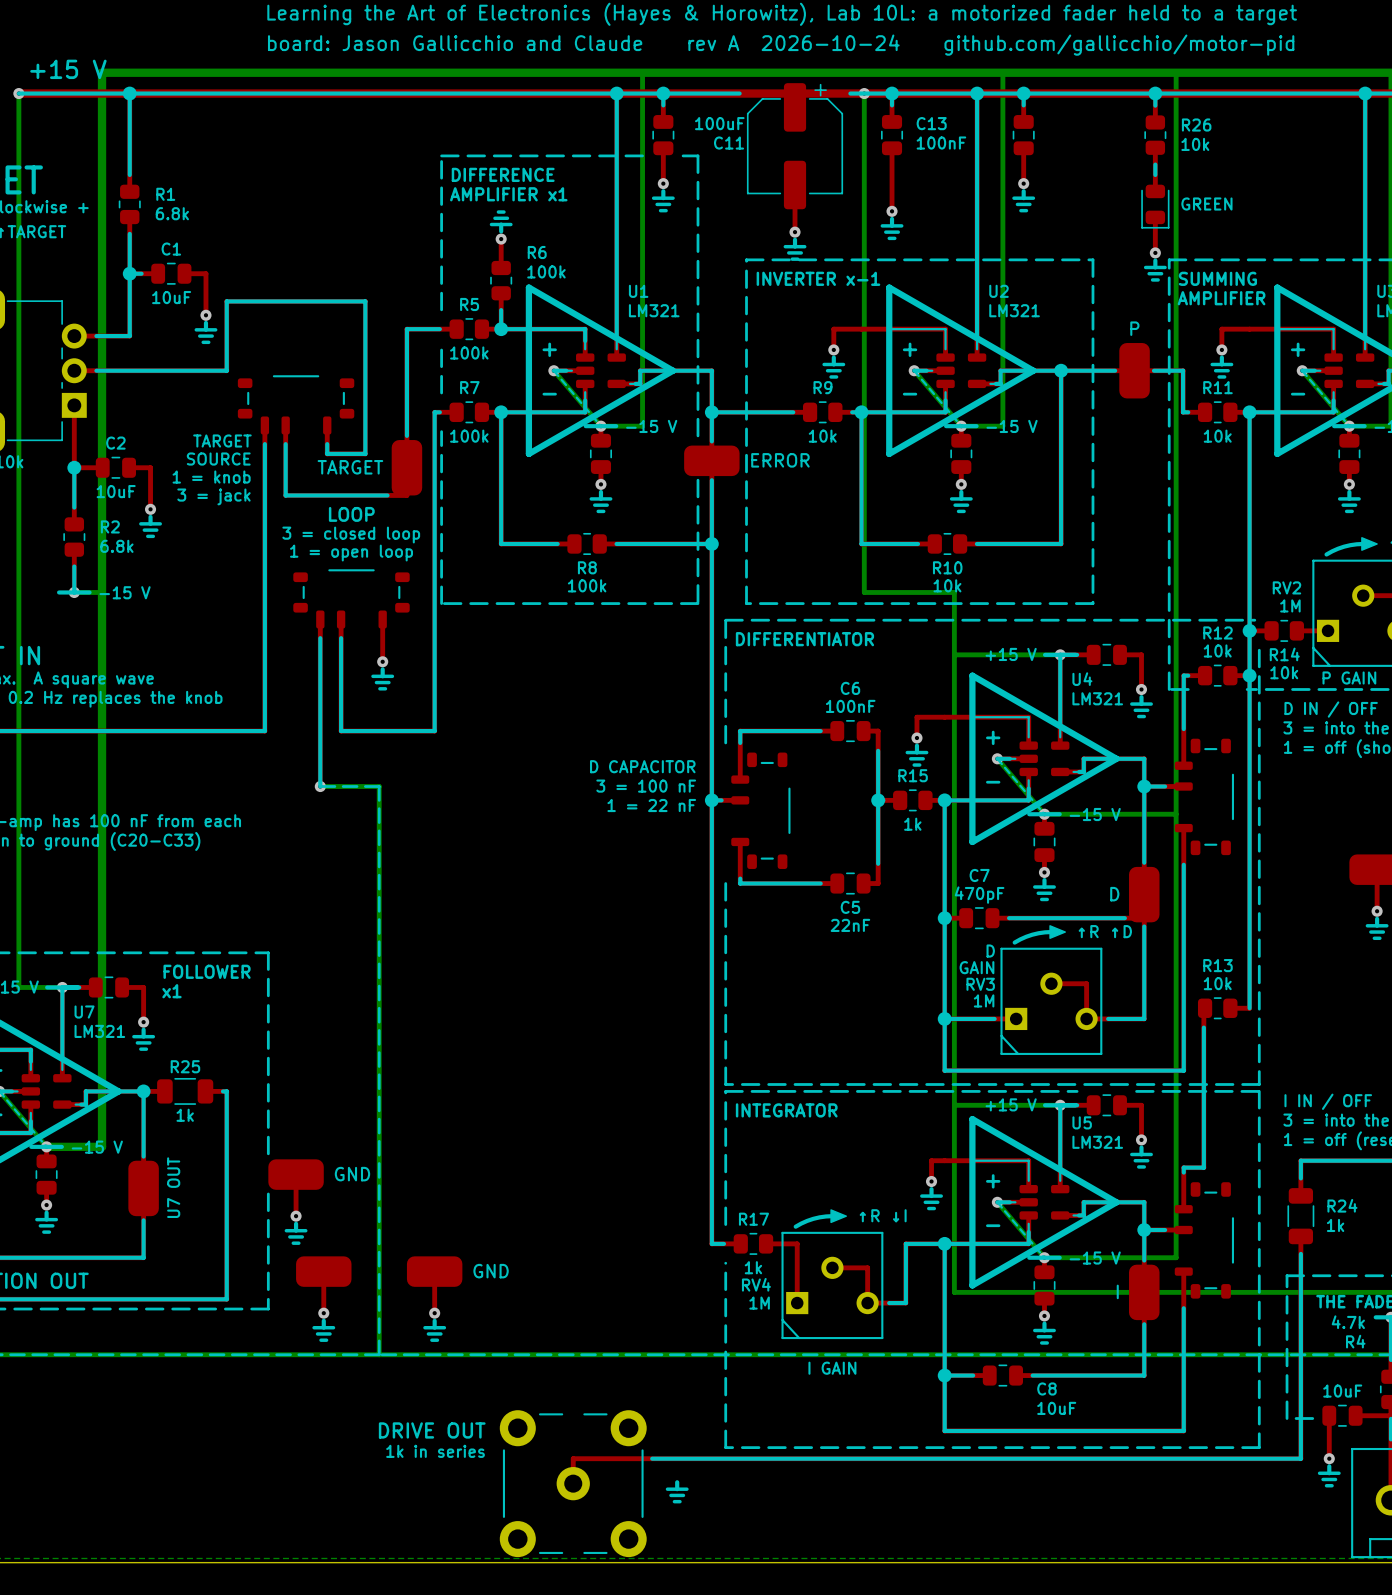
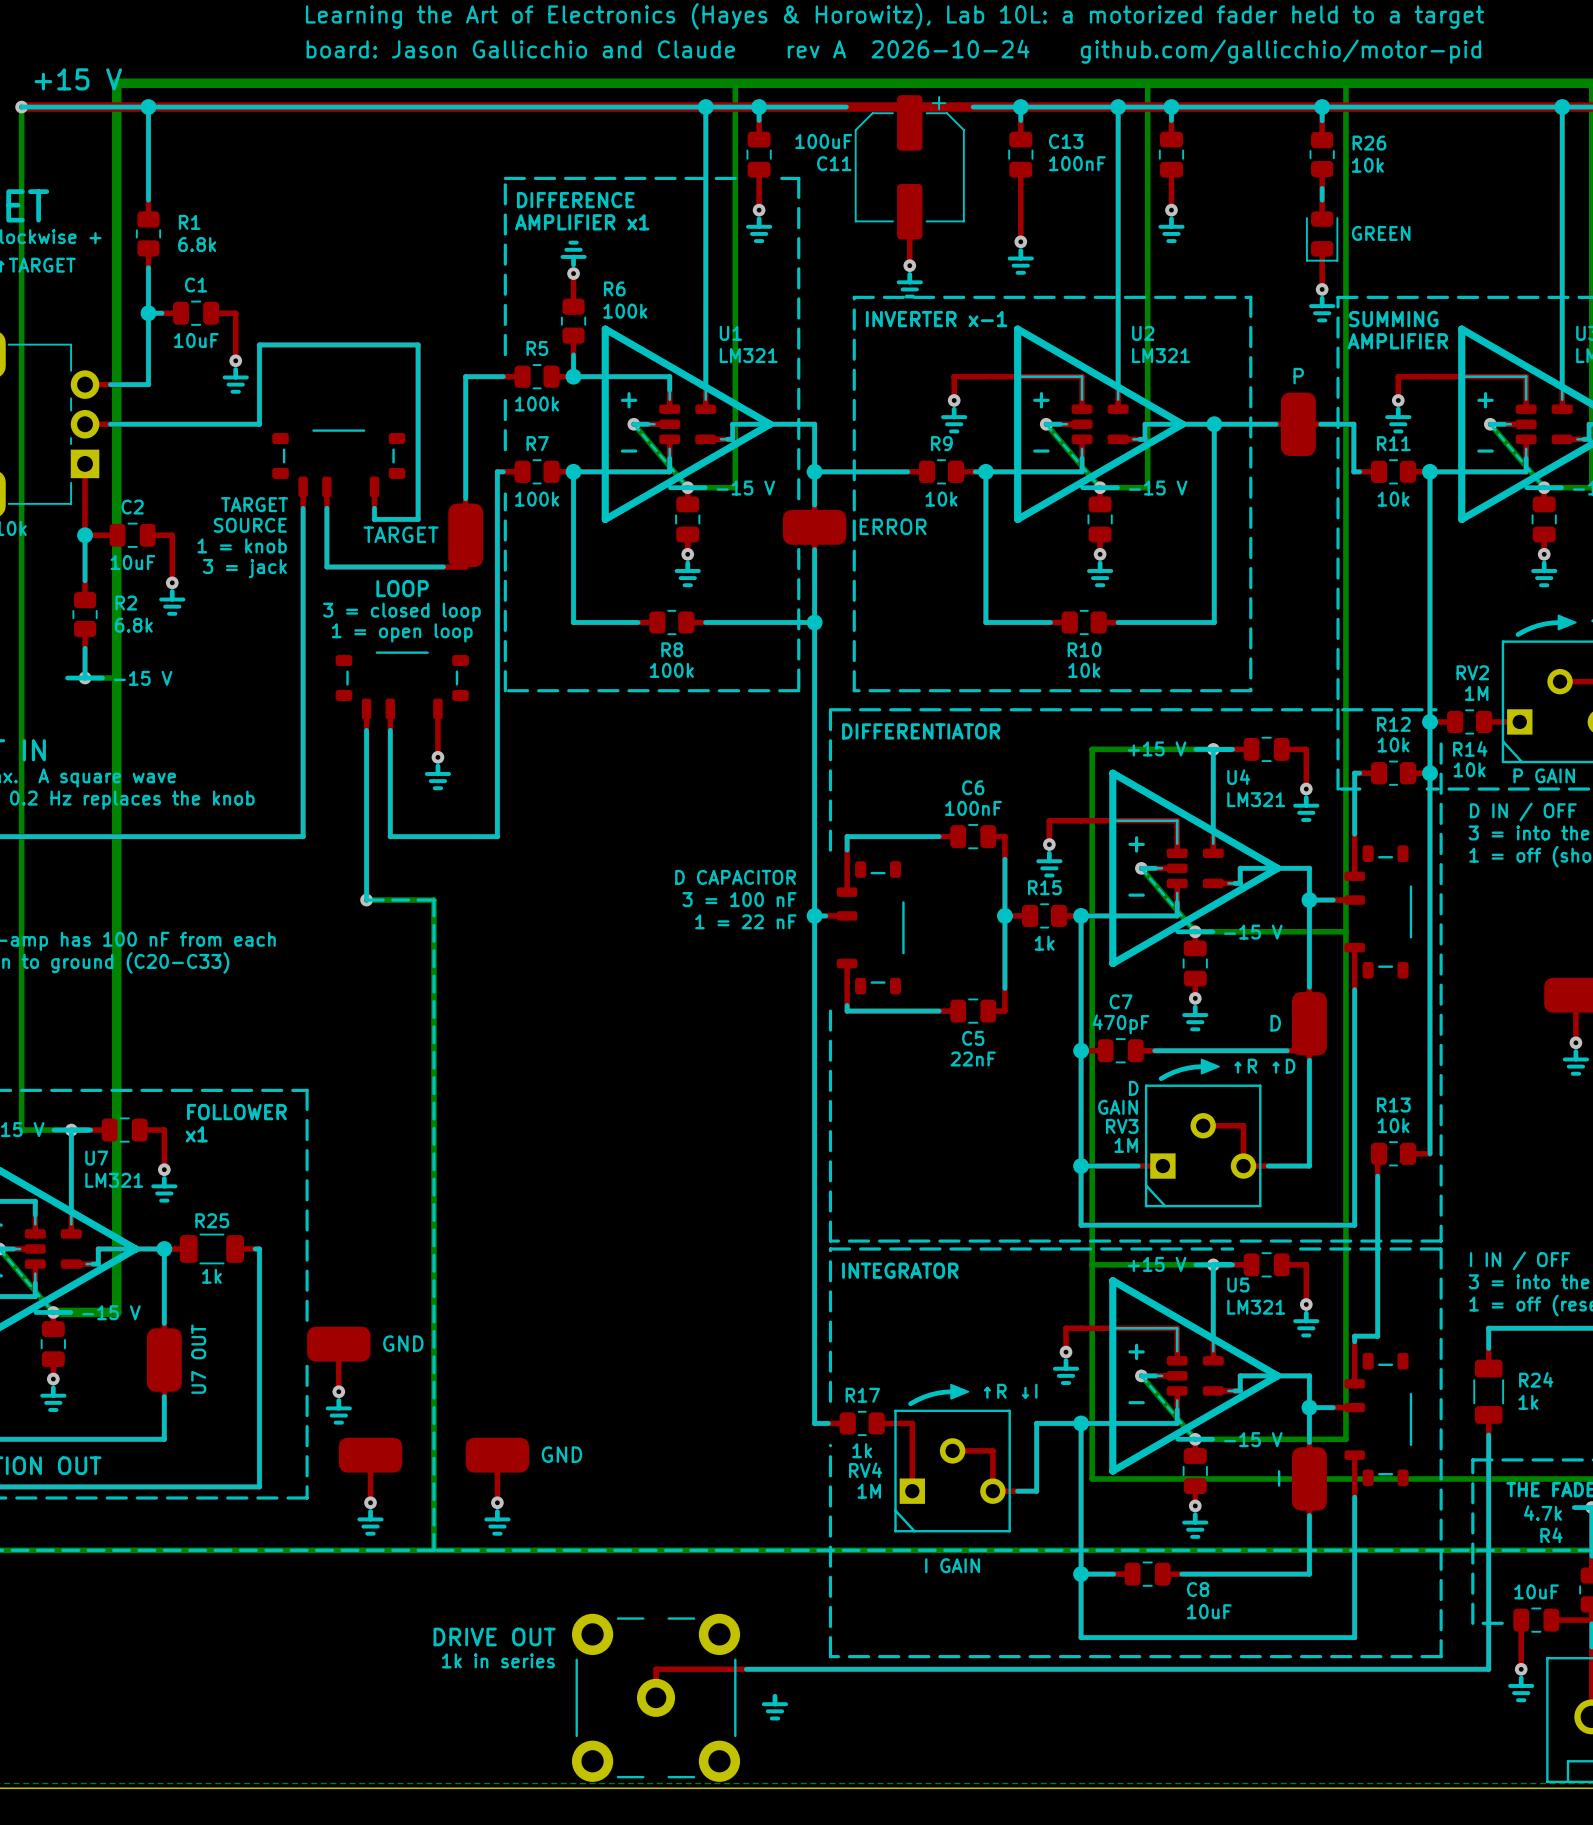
bottom track: (864, 93) (864, 592) (954, 592) (954, 654) -> none
via: (864, 93) -> none

